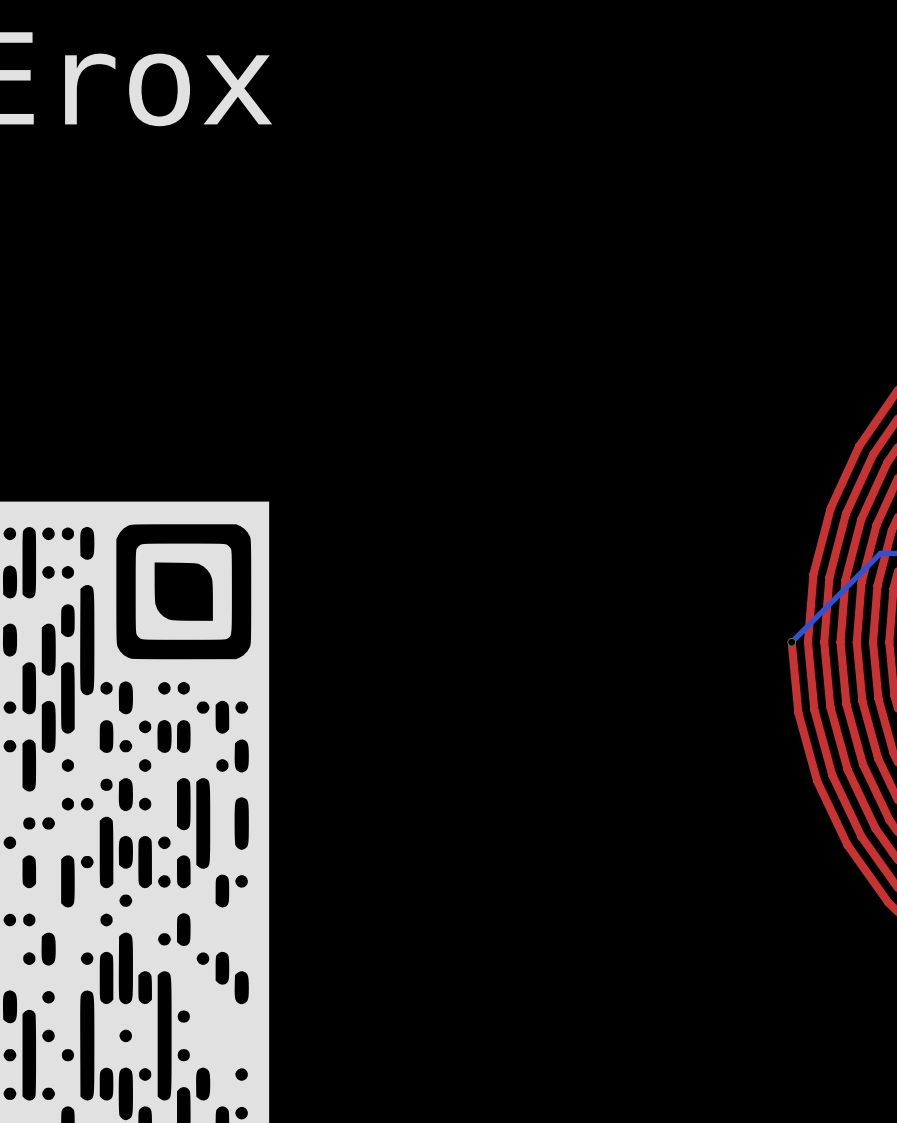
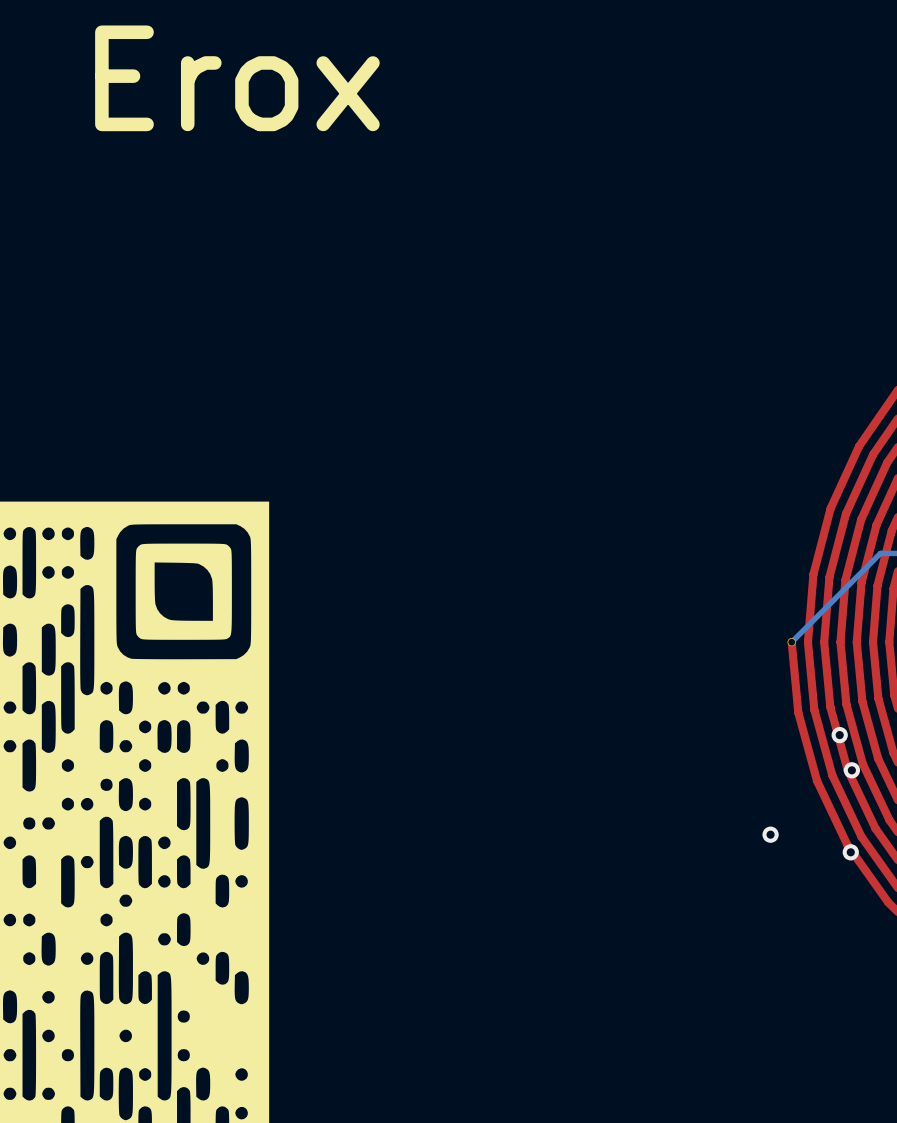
via: none -> (839, 735)
via: none -> (851, 770)
via: none -> (770, 834)
via: none -> (850, 852)

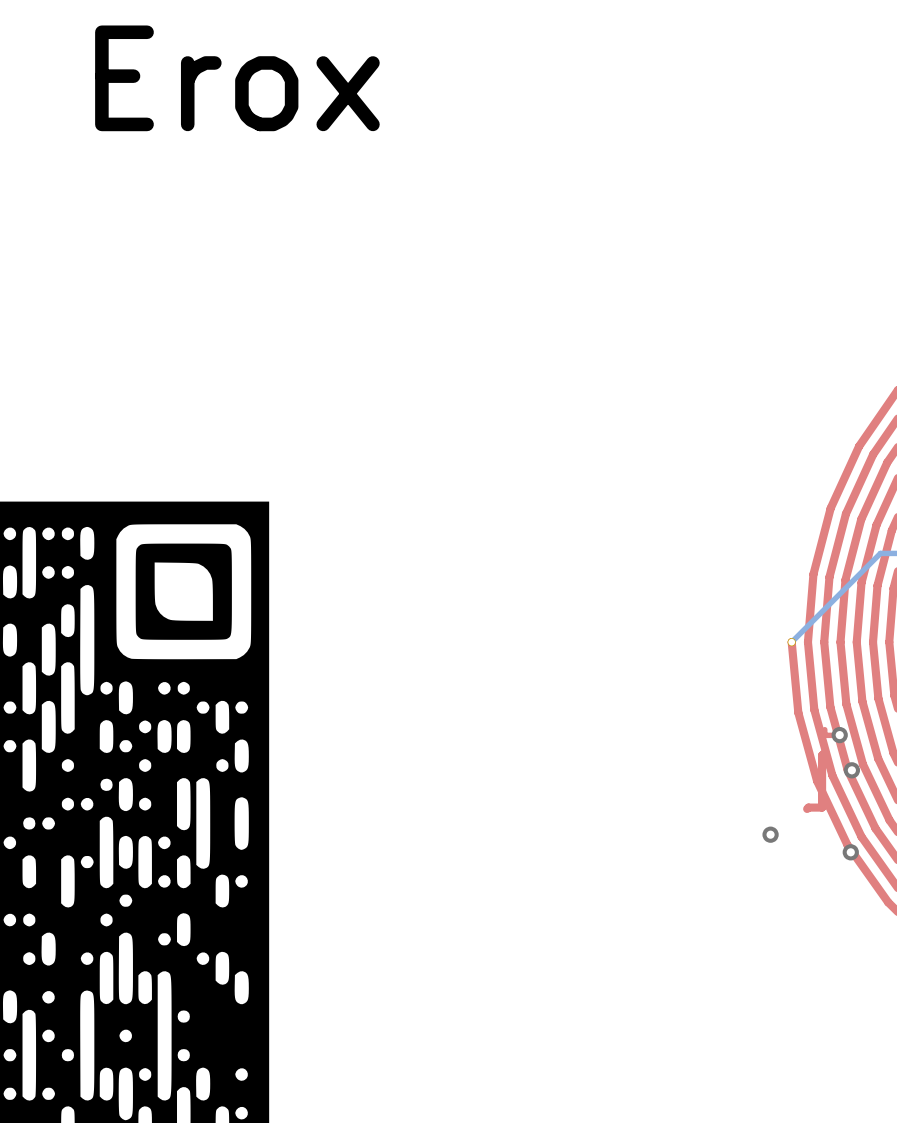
top track: none -> (824, 729) (824, 735) (839, 735)
top track: none -> (824, 766) (824, 752) (822, 755) (822, 807) (807, 808)

